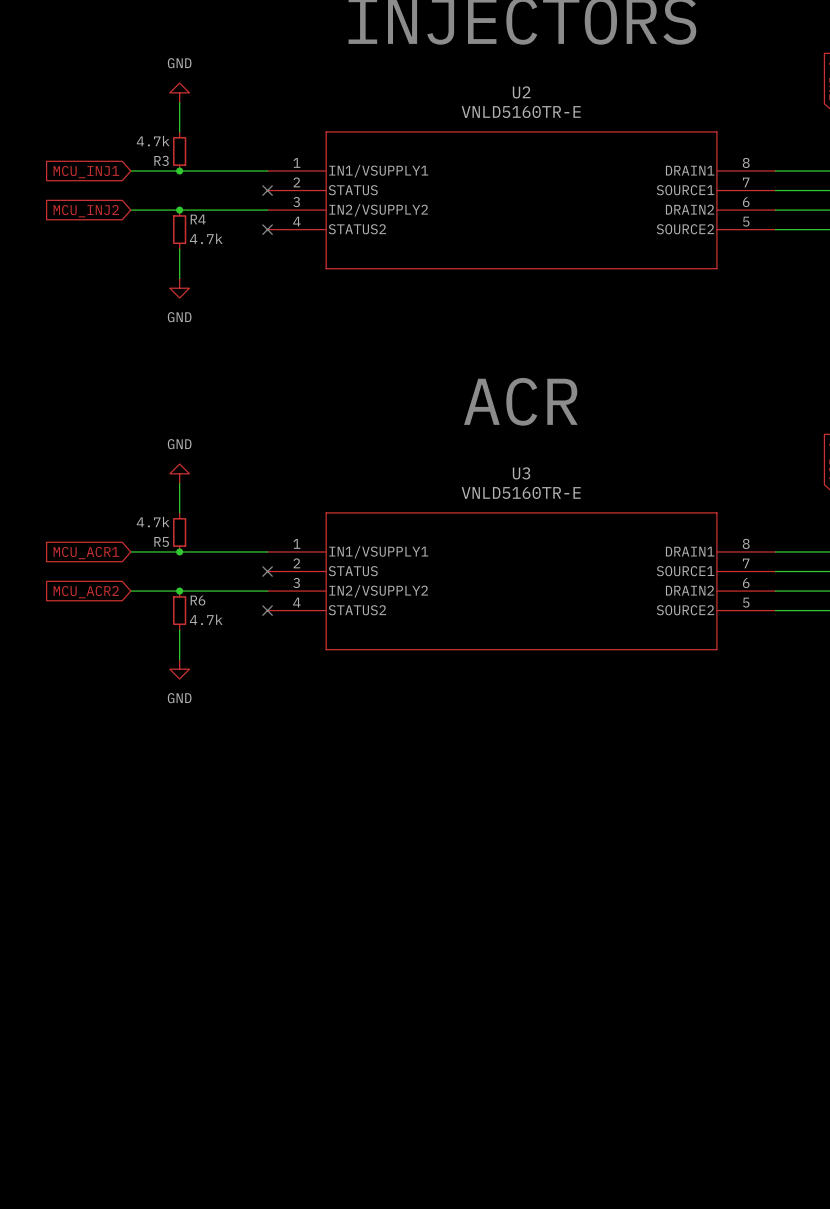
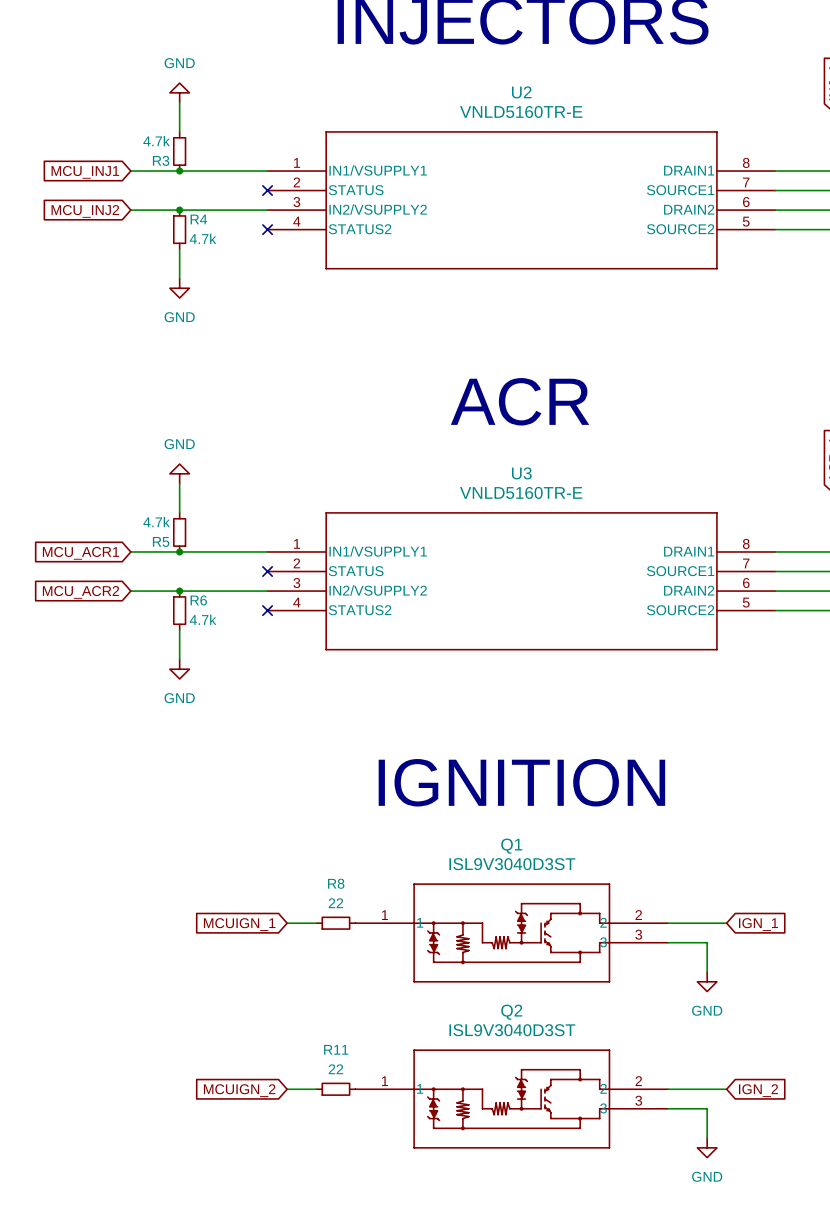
text: none -> IGNITION (521, 782)
wire: none -> (287, 923) (316, 923)
R8: none -> 22 (335, 923)
wire: none -> (668, 923) (726, 923)
global label: none -> MCUIGN_1 (239, 924)
global label: none -> IGN_1 (758, 924)
Q1: none -> ISL9V3040D3ST (511, 932)
wire: none -> (668, 942) (707, 942) (707, 972)
power symbol: none -> GND (707, 981)
wire: none -> (287, 1089) (316, 1089)
R11: none -> 22 (335, 1089)
wire: none -> (668, 1089) (726, 1089)
global label: none -> MCUIGN_2 (239, 1090)
global label: none -> IGN_2 (758, 1090)
Q2: none -> ISL9V3040D3ST (511, 1099)
wire: none -> (668, 1108) (707, 1108) (707, 1138)
power symbol: none -> GND (707, 1147)

